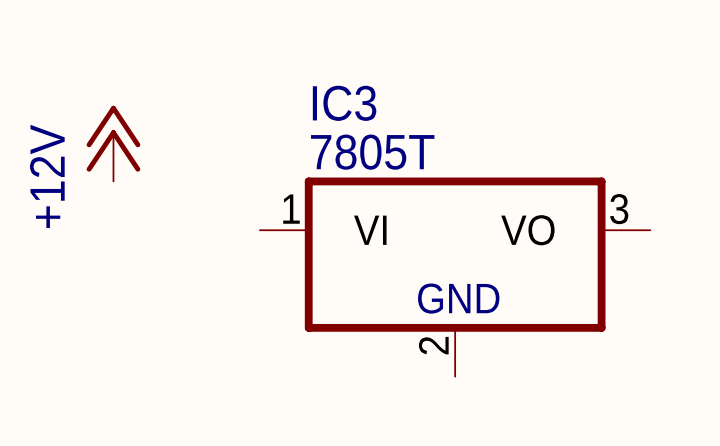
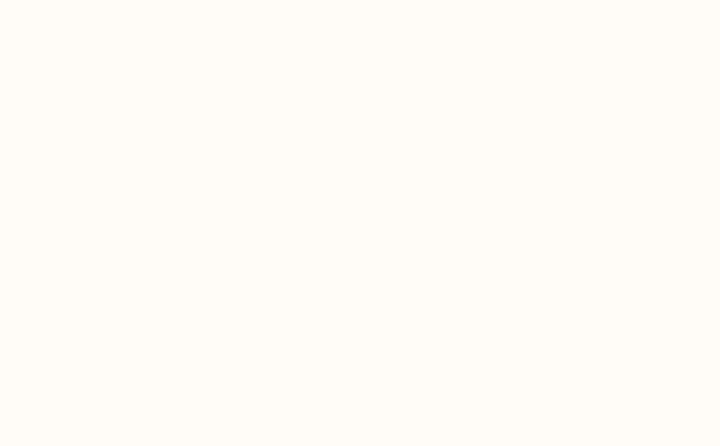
power symbol: +12V (113, 143) -> none
IC3: 7805T (455, 277) -> none

